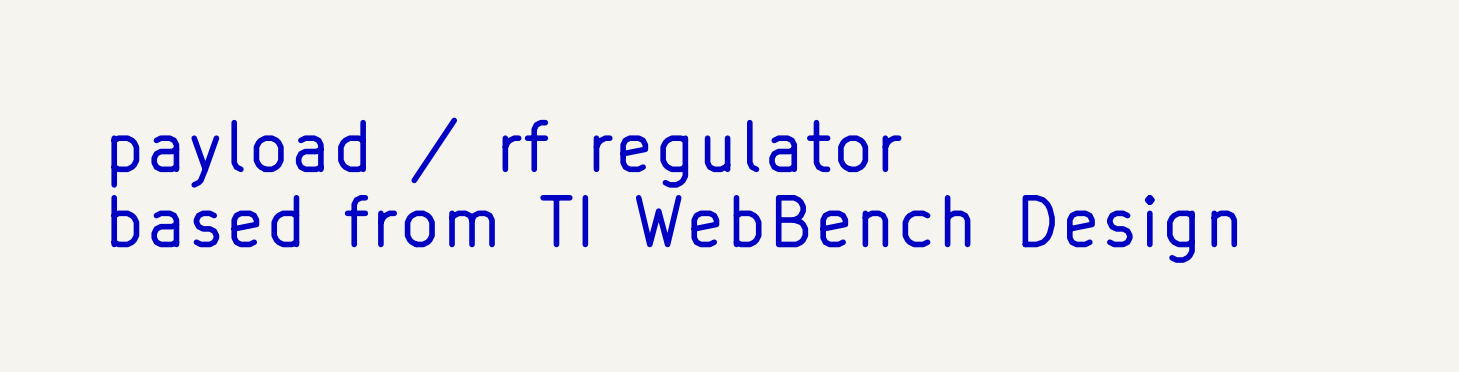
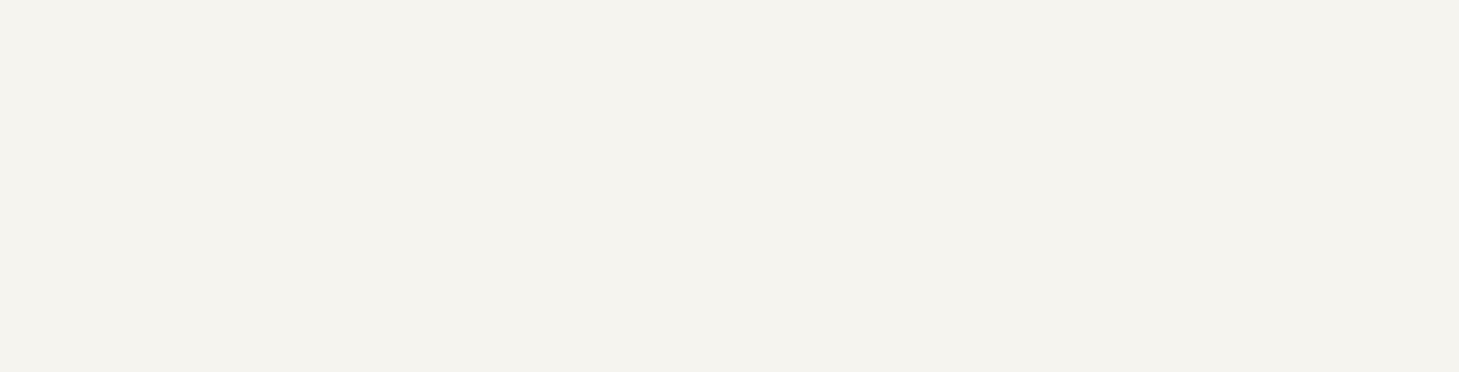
text: payload / rf regulator (506, 152) -> none
text: based from TI WebBench Design (674, 228) -> none

